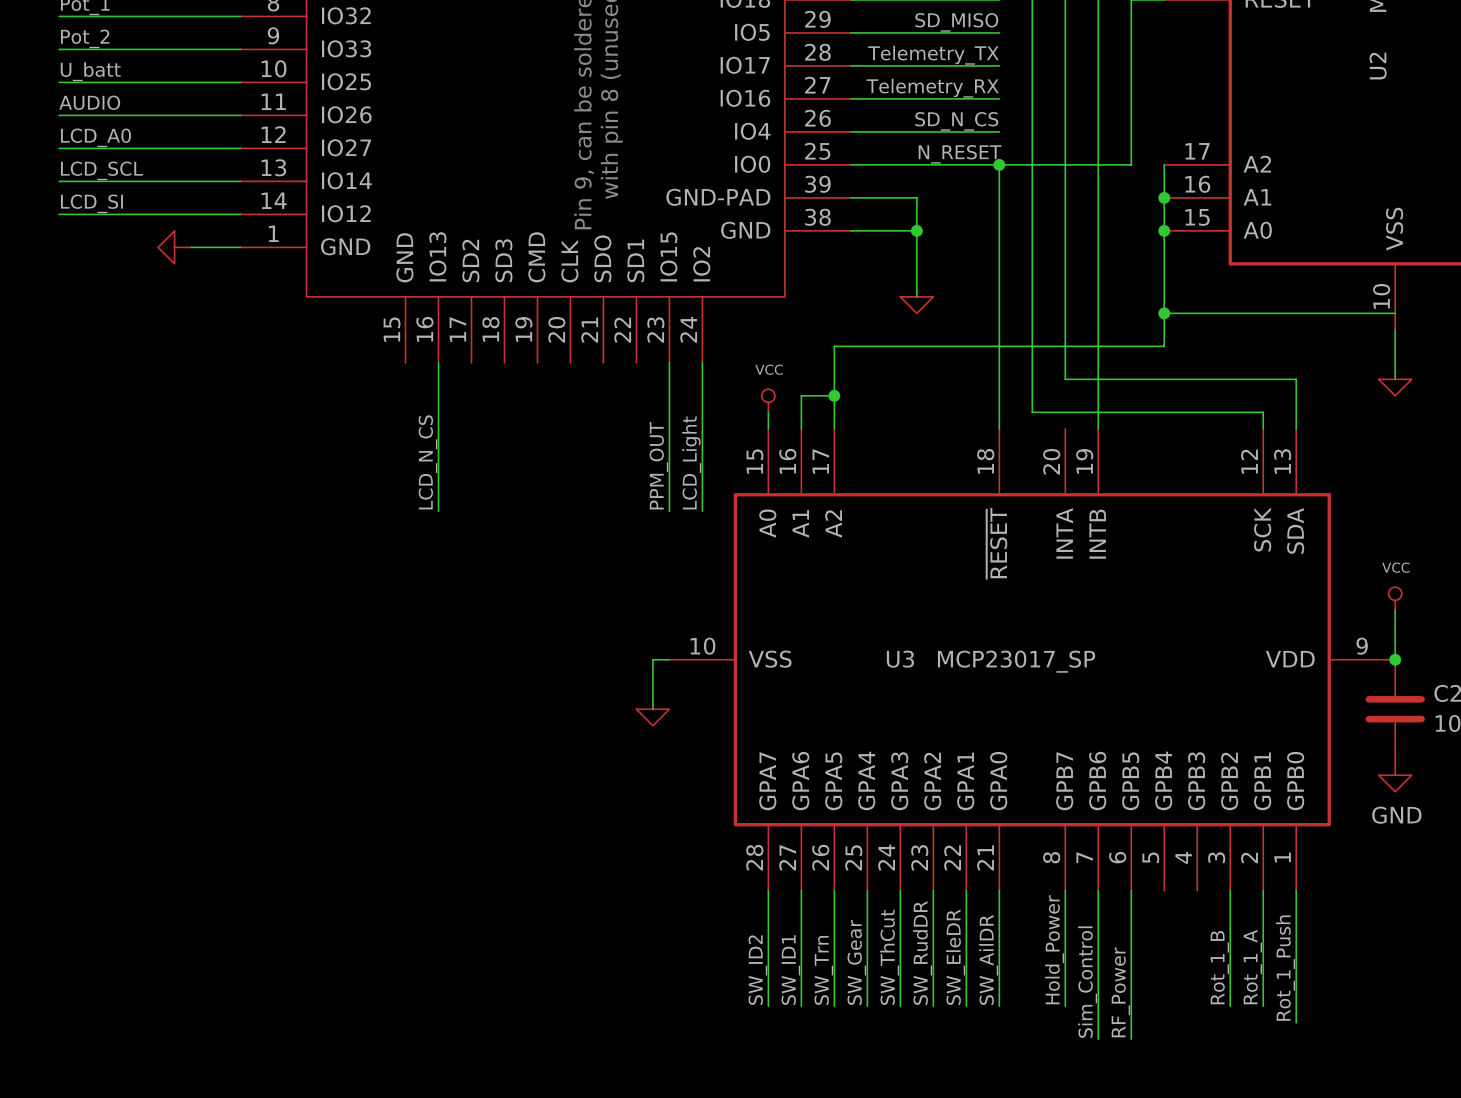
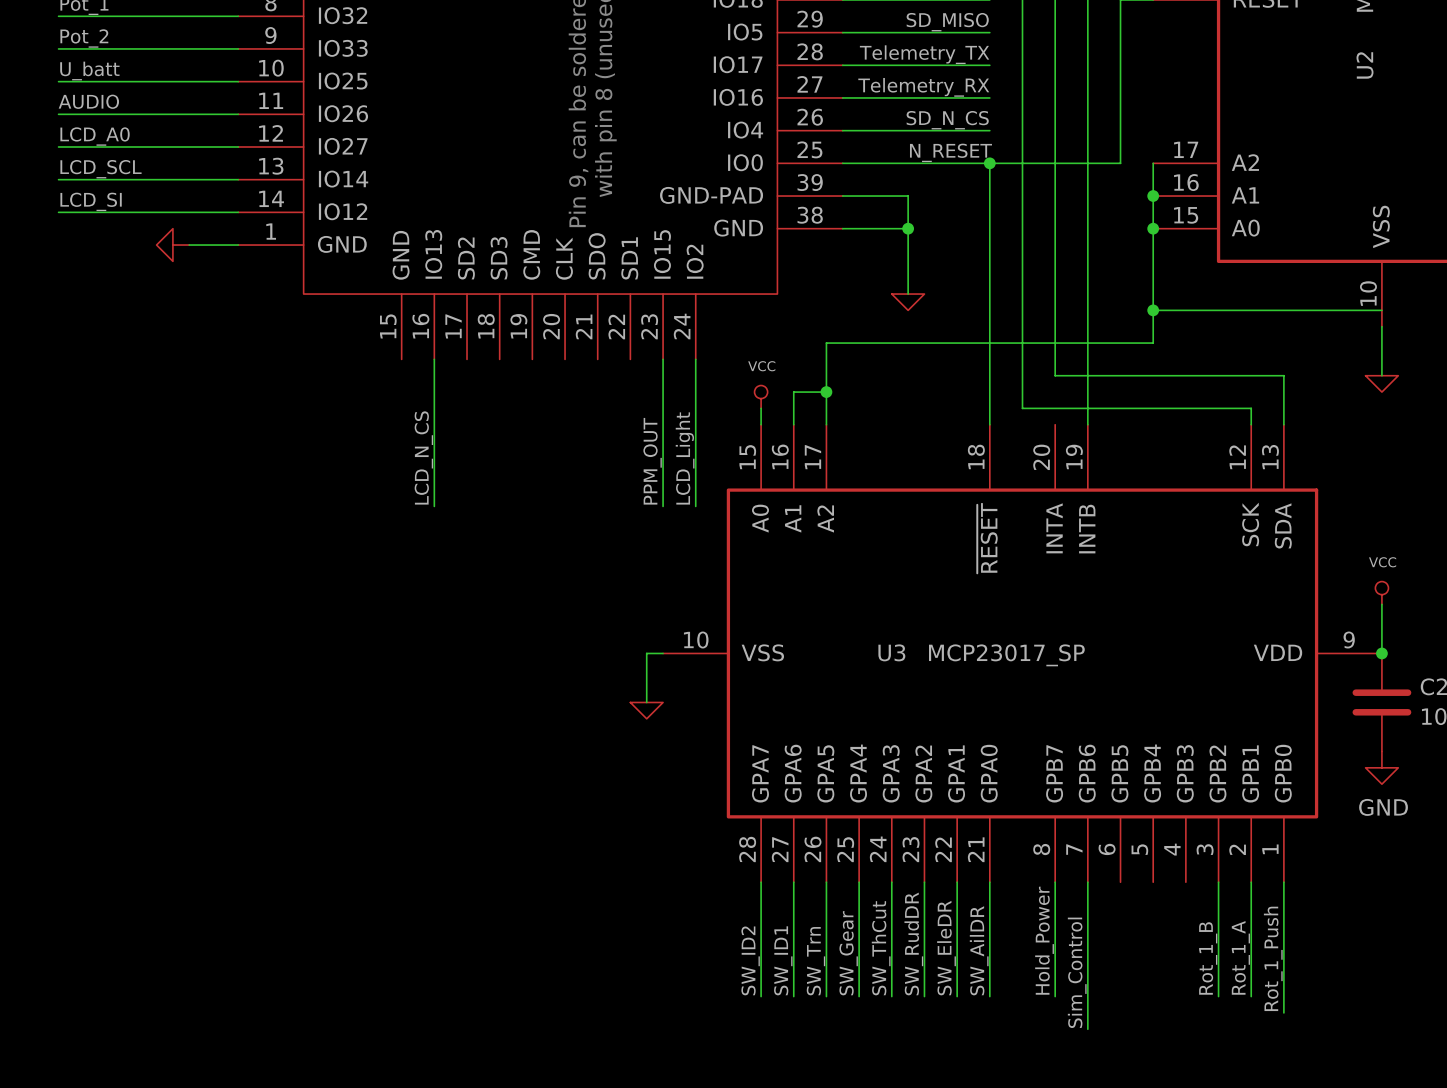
wire: (1131, 890) (1131, 1039) -> none
label: RF_Power (1120, 992) -> none

